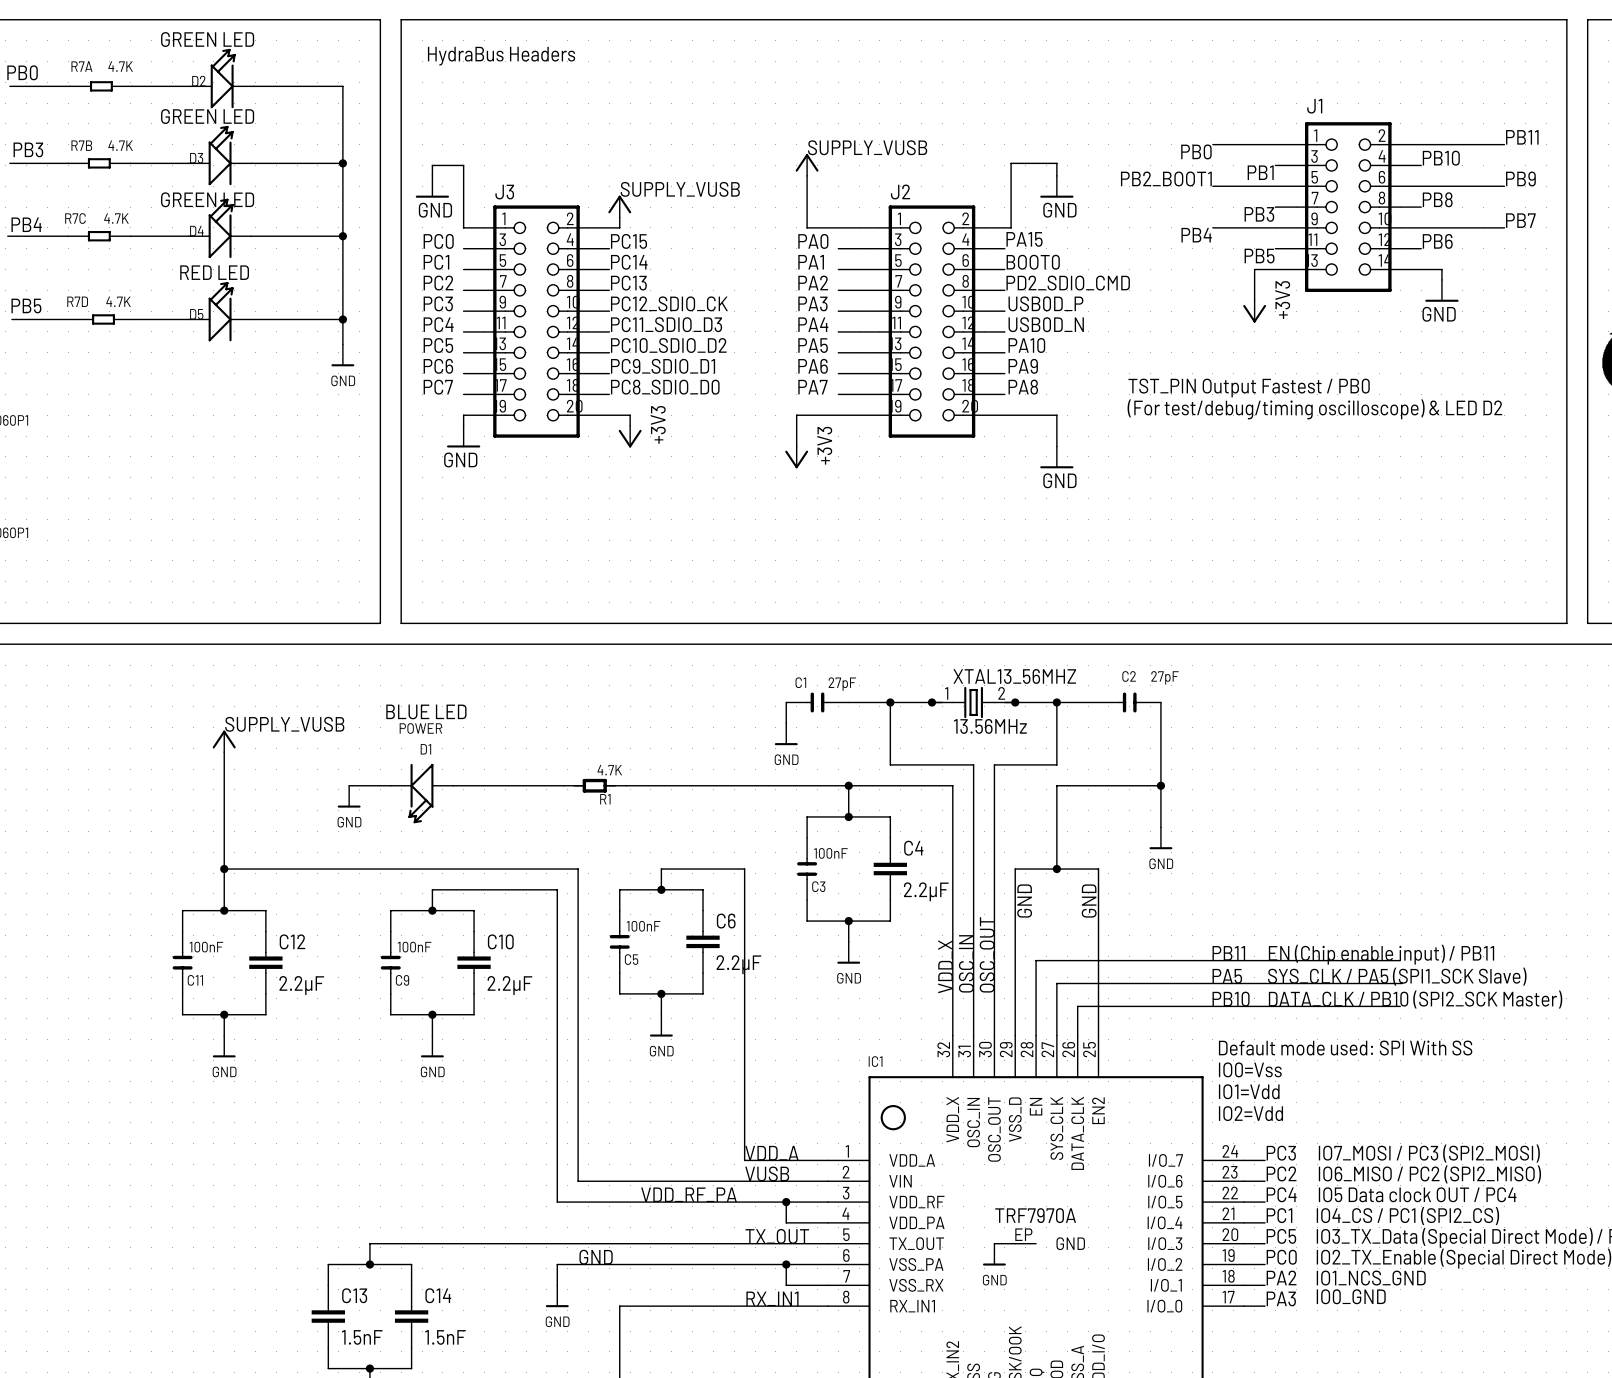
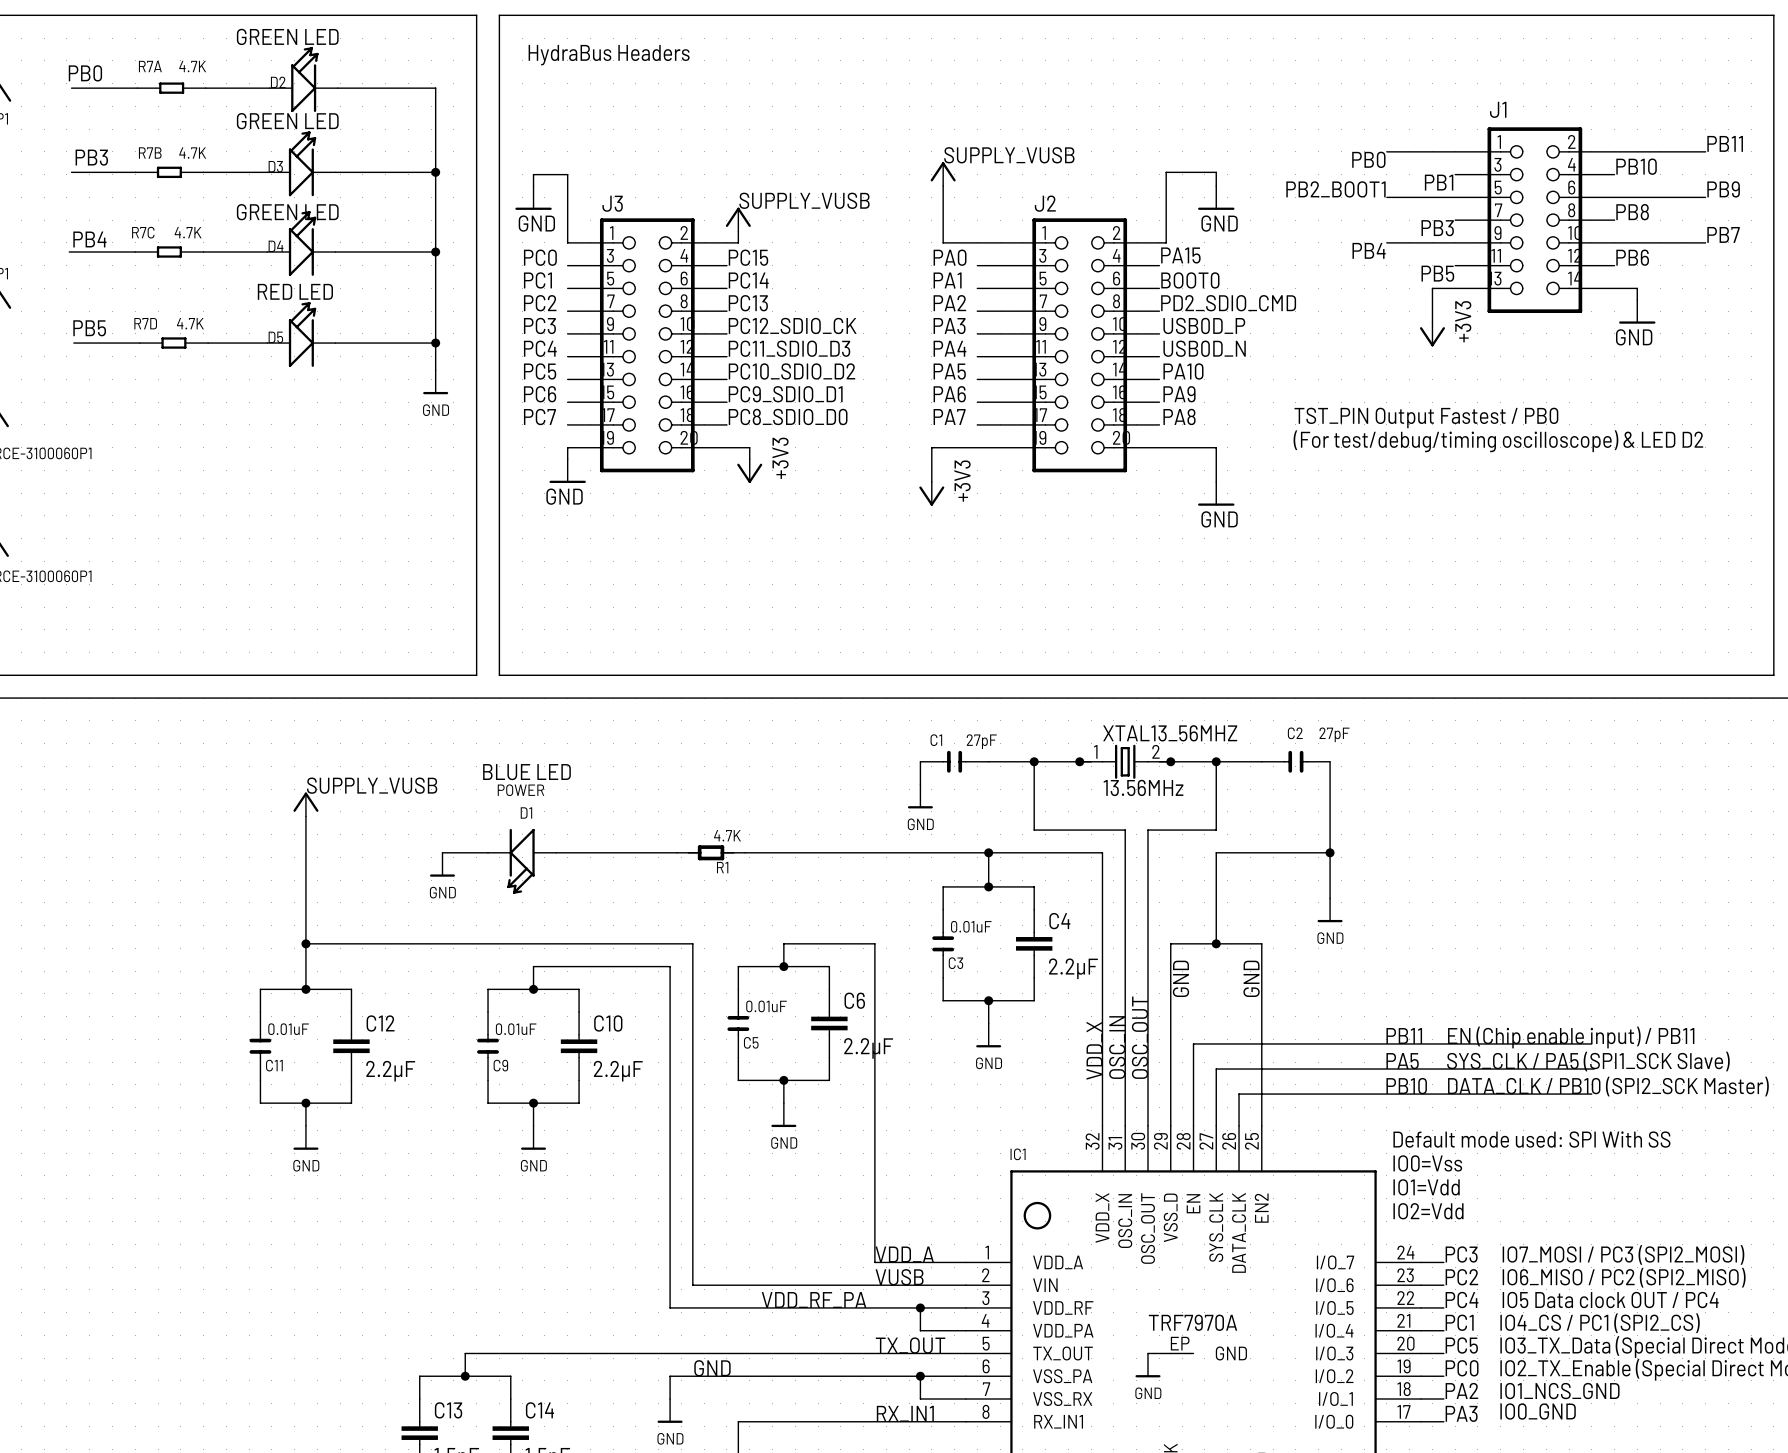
C3 value: 100nF (830, 853) -> 0.01uF (971, 926)
C5 value: 100nF (643, 926) -> 0.01uF (766, 1006)
C11 value: 100nF (206, 947) -> 0.01uF (288, 1029)
C9 value: 100nF (414, 947) -> 0.01uF (516, 1029)

